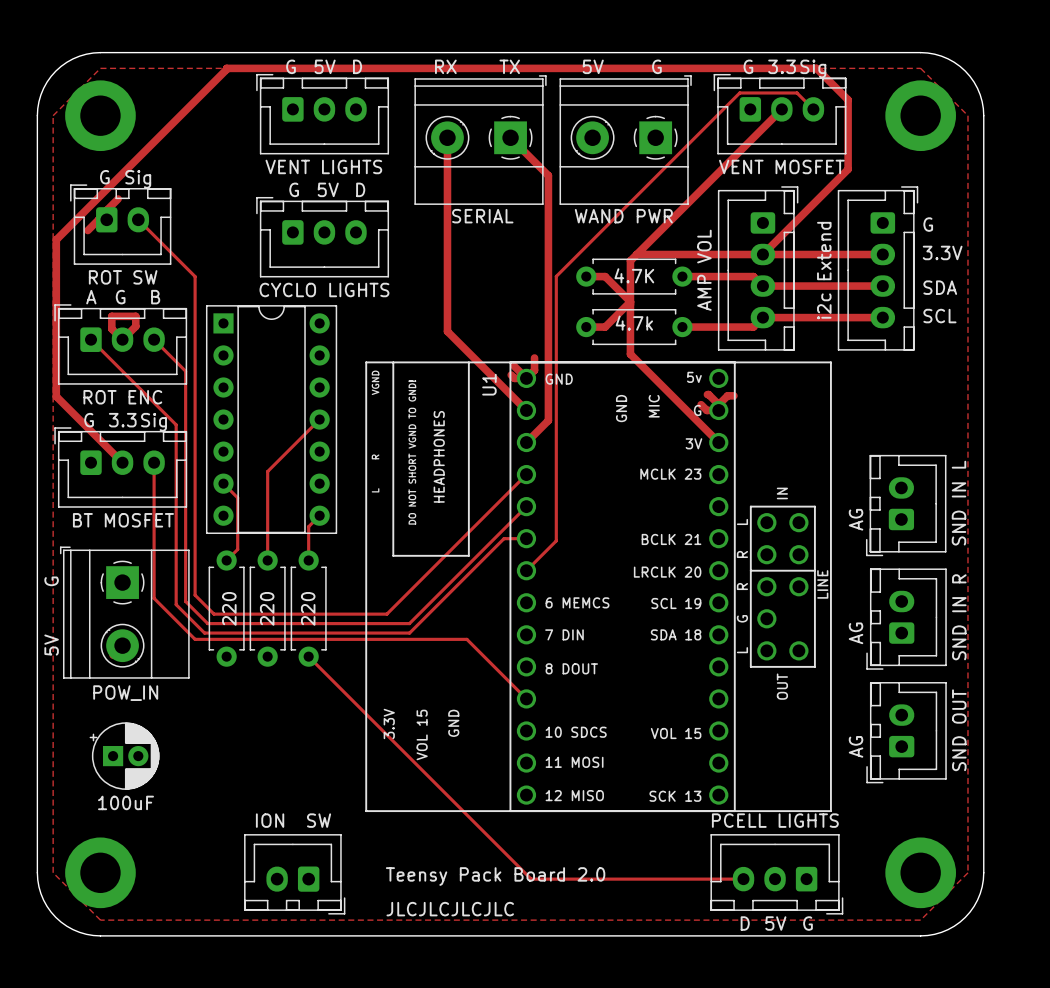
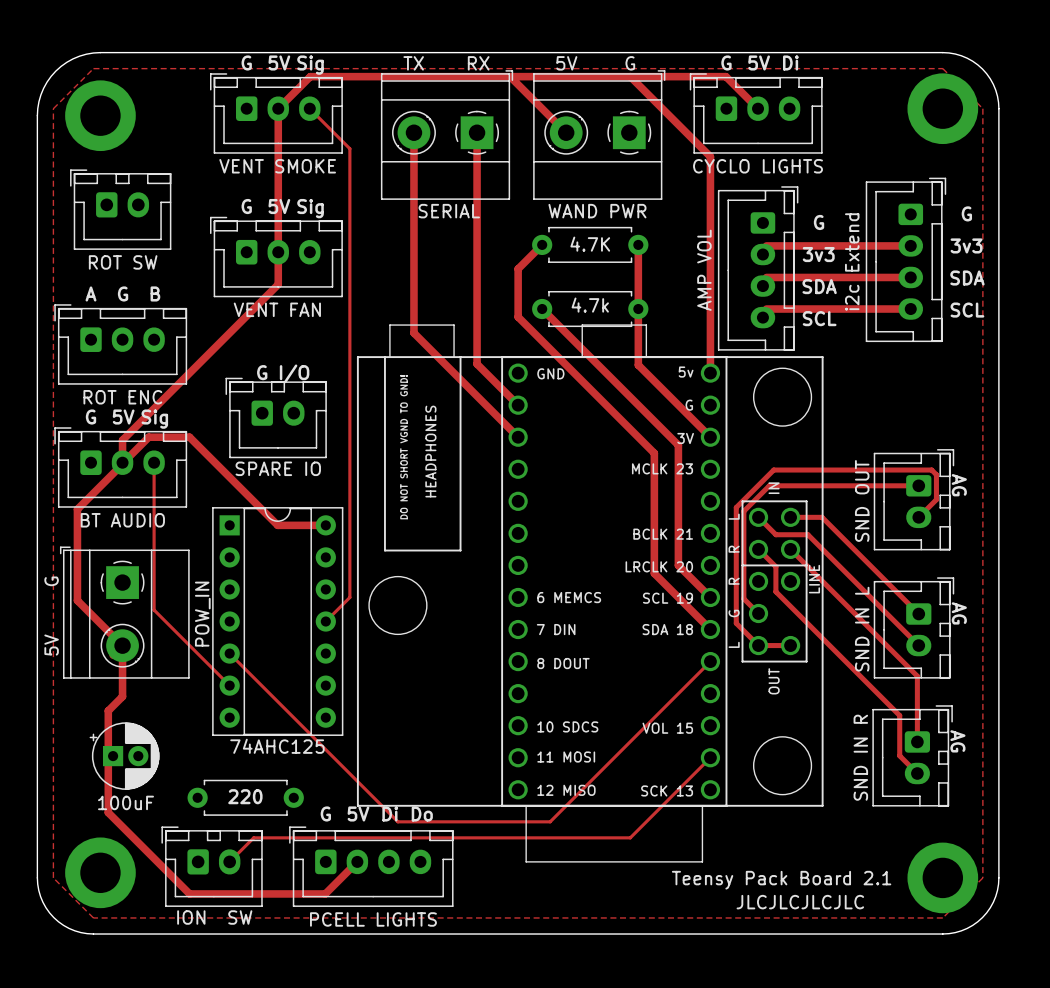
board edge: (920, 52) (934, 54) (948, 58) (965, 71) (977, 88) (982, 101) (983, 115) (983, 872) (982, 886) (977, 900) (965, 917) (954, 926) (941, 932) (920, 935) (100, 935) (86, 934) (73, 929) (55, 917) (43, 900) (38, 886) (37, 872) -> (920, 52) (949, 52) (972, 61) (990, 78) (998, 102) (998, 877) (993, 902) (982, 917) (961, 930) (942, 934) (93, 934) (69, 928) (53, 917) (40, 896) (37, 872)
text: G (290, 66) -> none
text: 5V (325, 66) -> none
text: D (357, 66) -> none
text position: RX (445, 66) -> RX (478, 63)
text position: TX (509, 66) -> TX (413, 63)
text position: 5V (593, 66) -> 5V (566, 63)
text position: G (656, 66) -> G (630, 63)
text: G (748, 66) -> none
text: 3.3 (782, 66) -> none
zone outline: (100, 68) (920, 68) (967, 115) (967, 872) (920, 920) (100, 920) (53, 872) (53, 115) (100, 68) -> (93, 68) (53, 108) (53, 877) (93, 917) (942, 917) (982, 877) (982, 108) (942, 68) (93, 68)
text: Sig (813, 68) -> none
track: none -> (510, 76) (566, 132)
track: none -> (630, 76) (710, 156) (710, 373)
track: none -> (309, 108) (349, 148) (349, 597) (325, 621)
track: none -> (758, 108) (725, 76) (310, 76) (278, 108) (278, 284) (122, 440) (122, 464) (77, 509) (77, 600) (122, 645) (122, 696) (108, 710) (108, 812) (189, 893) (325, 893) (357, 861)
track: (781, 109) (630, 260) (630, 354) (718, 442) -> none
track: (813, 109) (797, 92) (739, 92) (556, 276) (556, 540) (526, 570) -> none
part: none -> VENT SMOKE (276, 113)
part: none -> CYCLO LIGHTS (756, 113)
part: VENT LIGHTS (322, 114) -> none
part: VENT MOSFET (780, 114) -> none
part position: (920, 115) -> (942, 108)
track: none -> (413, 132) (413, 333) (518, 437)
track: none -> (477, 132) (477, 364) (518, 405)
track: (447, 137) (447, 331) (526, 410) -> none
track: (510, 137) (548, 175) (548, 420) (526, 442) -> none
part position: (480, 140) -> (447, 135)
part position: (625, 140) -> (599, 135)
text: G (104, 177) -> none
text: Sig (138, 179) -> none
text: G (294, 189) -> none
text: 5V (328, 189) -> none
text: D (360, 189) -> none
track: (118, 198) (106, 210) (106, 219) (98, 219) (87, 230) -> none
track: (138, 219) (195, 276) (195, 595) (214, 614) (386, 614) (526, 474) -> none
part text: none -> G (819, 222)
part position: (120, 224) -> (120, 209)
text: G (928, 224) -> none
part: CYCLO LIGHTS (322, 237) -> none
track: none -> (542, 244) (518, 268) (518, 317) (654, 453) (654, 573) (710, 629)
track: none -> (638, 244) (638, 365) (710, 437)
track: none -> (766, 245) (910, 245)
text: 3.3V (942, 252) -> none
track: (636, 254) (882, 254) -> none
track: (762, 254) (848, 169) (848, 99) (816, 68) (226, 68) (56, 239) (56, 396) (122, 462) -> (325, 525) (277, 525) (189, 437) (148, 437) (122, 462)
part text: none -> 3v3 (818, 254)
part: none -> VENT FAN (276, 257)
part: none -> i2c Extend (905, 259)
part: i2c Extend (878, 268) -> none
track: (586, 276) (605, 276) (630, 301) (605, 327) (586, 327) -> none
part position: (634, 276) -> (590, 244)
track: (682, 276) (753, 276) (762, 286) (882, 286) -> none
track: none -> (766, 277) (910, 277)
part text: none -> SDA (819, 286)
text: SDA (940, 287) -> none
part text: none -> A (91, 293)
part text: none -> G (123, 293)
part text: none -> B (155, 293)
text: A (91, 297) -> none
text: G (120, 297) -> none
text: B (155, 297) -> none
part footprint: [205, 305, 338, 535] -> [225, 377, 327, 459]
track: none -> (542, 309) (678, 445) (678, 565) (710, 597)
track: none -> (766, 309) (910, 309)
track: (111, 316) (135, 316) (135, 326) (122, 339) (111, 328) (111, 316) -> none
text: SCL (939, 316) -> none
track: (882, 317) (762, 317) (753, 327) (682, 327) -> none
part text: none -> SCL (819, 318)
part position: (634, 327) -> (590, 309)
track: (91, 339) (176, 424) (176, 604) (204, 633) (409, 633) (504, 538) (526, 538) -> none
track: (154, 339) (185, 371) (185, 601) (207, 623) (409, 623) (526, 506) -> none
track: (534, 357) (534, 370) (526, 378) -> none
track: (514, 366) (526, 378) -> none
track: (511, 375) (514, 378) (526, 378) -> none
track: (707, 394) (718, 404) -> none
track: (733, 395) (727, 395) (718, 404) -> none
track: (701, 404) (706, 410) (718, 410) (718, 404) -> none
part text: none -> G (91, 417)
part text: none -> 5V (123, 417)
part text: none -> Sig (154, 419)
track: (319, 419) (267, 471) (267, 560) -> none
text: G (89, 420) -> none
text: 3.3 (122, 420) -> none
text: Sig (153, 422) -> none
part footprint: [865, 454, 947, 557] -> [873, 449, 955, 551]
part value: none -> SPARE IO (278, 468)
track: (223, 483) (237, 497) (237, 549) (226, 560) -> none
track: none -> (918, 485) (769, 485) (743, 511) (743, 598) (758, 613)
part value: SND IN L (959, 503) -> SND OUT (862, 500)
track: (311, 515) (319, 515) (308, 526) (308, 560) -> none
track: none -> (758, 517) (775, 534) (807, 534) (918, 645)
track: none -> (790, 517) (822, 517) (918, 614)
track: none -> (918, 517) (936, 499) (936, 474) (931, 470) (773, 470) (736, 507) (736, 623) (758, 645) (790, 645)
text: AG (856, 519) -> none
part value: BT MOSFET (123, 520) -> BT AUDIO (122, 520)
track: none -> (758, 549) (775, 566) (775, 591) (899, 715) (899, 755) (917, 773)
track: none -> (790, 549) (917, 676) (917, 741)
text: none -> LRCLK 20 (659, 566)
part footprint: [866, 568, 947, 670] -> [873, 577, 955, 679]
U1: (598, 586) -> none
part: none -> (590, 593)
track: (154, 598) (195, 639) (466, 639) (526, 698) -> (154, 598) (154, 610) (229, 685)
part: 220 (226, 608) -> none
part: 220 (267, 608) -> none
part: 220 (308, 608) -> none
part value: SND IN R (959, 617) -> SND IN L (862, 629)
part: none -> 74AHC125 (277, 621)
text: AG (856, 633) -> none
track: none -> (229, 653) (397, 821) (550, 821) (710, 661)
track: (308, 656) (531, 879) (743, 879) -> none
part value rotation: 0° (125, 693) -> 90° counterclockwise (202, 614)
part value position: POW_IN (125, 693) -> POW_IN (202, 614)
part: SND OUT (906, 732) -> none
text: AG (856, 746) -> none
part: none -> SND IN R (912, 755)
track: none -> (710, 757) (630, 837) (253, 837) (229, 861)
part: none -> 220 (245, 797)
part: none -> PCELL LIGHTS (371, 866)
part position: (920, 872) -> (942, 877)
part rotation: 0° (294, 874) -> 180° (212, 866)
part position: (294, 874) -> (212, 866)
part: PCELL LIGHTS (776, 874) -> none
text: Teensy Pack Board 2.0 (495, 876) -> none
text: none -> Teensy Pack Board 2.1 (781, 880)
text: none -> JLCJLCJLCJLC (800, 902)
text: JLCJLCJLCJLC (450, 909) -> none
text: D (745, 923) -> none
text: 5V (775, 923) -> none
text: G (808, 923) -> none

